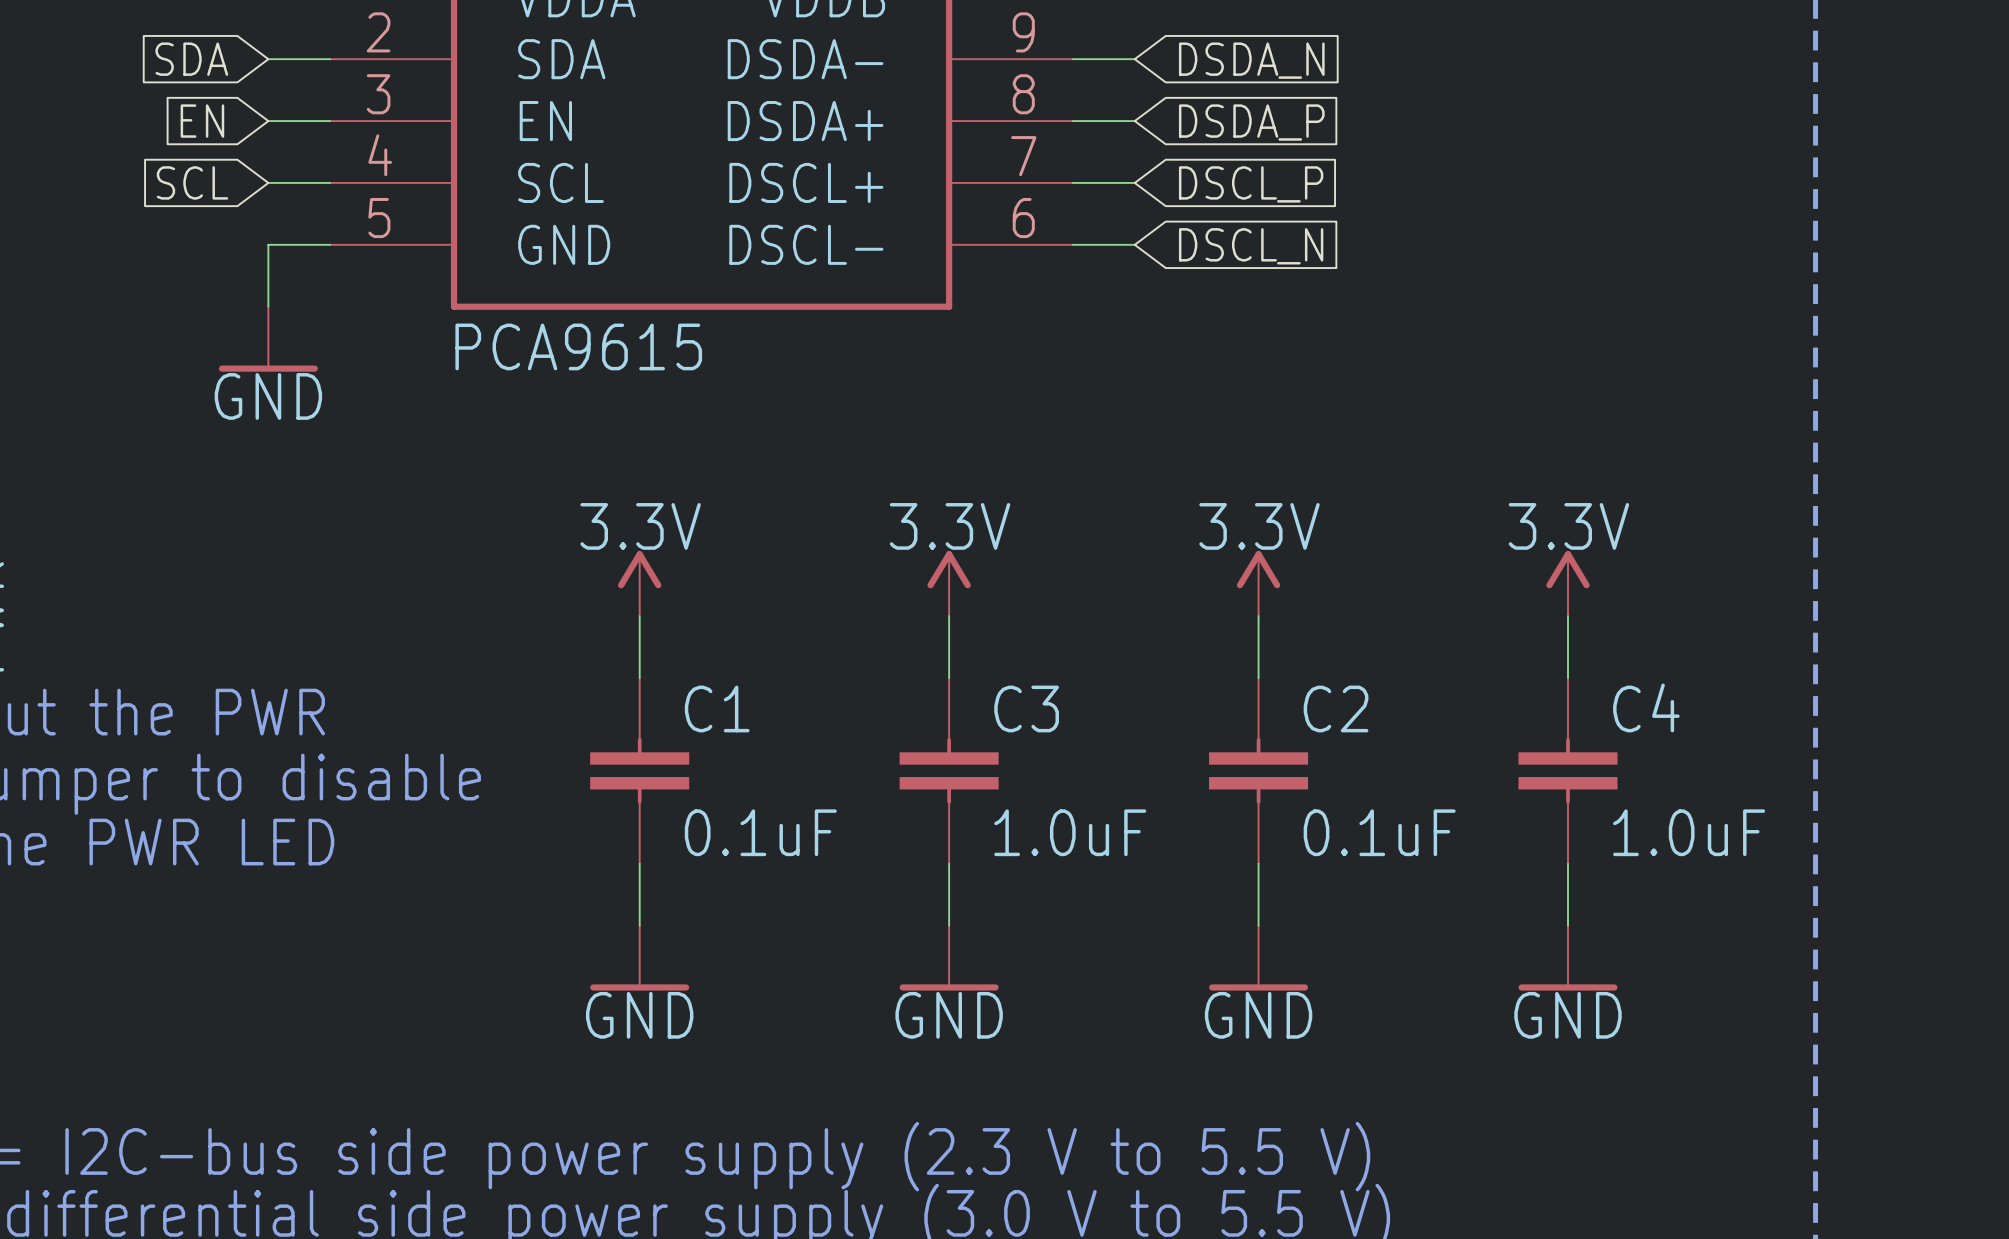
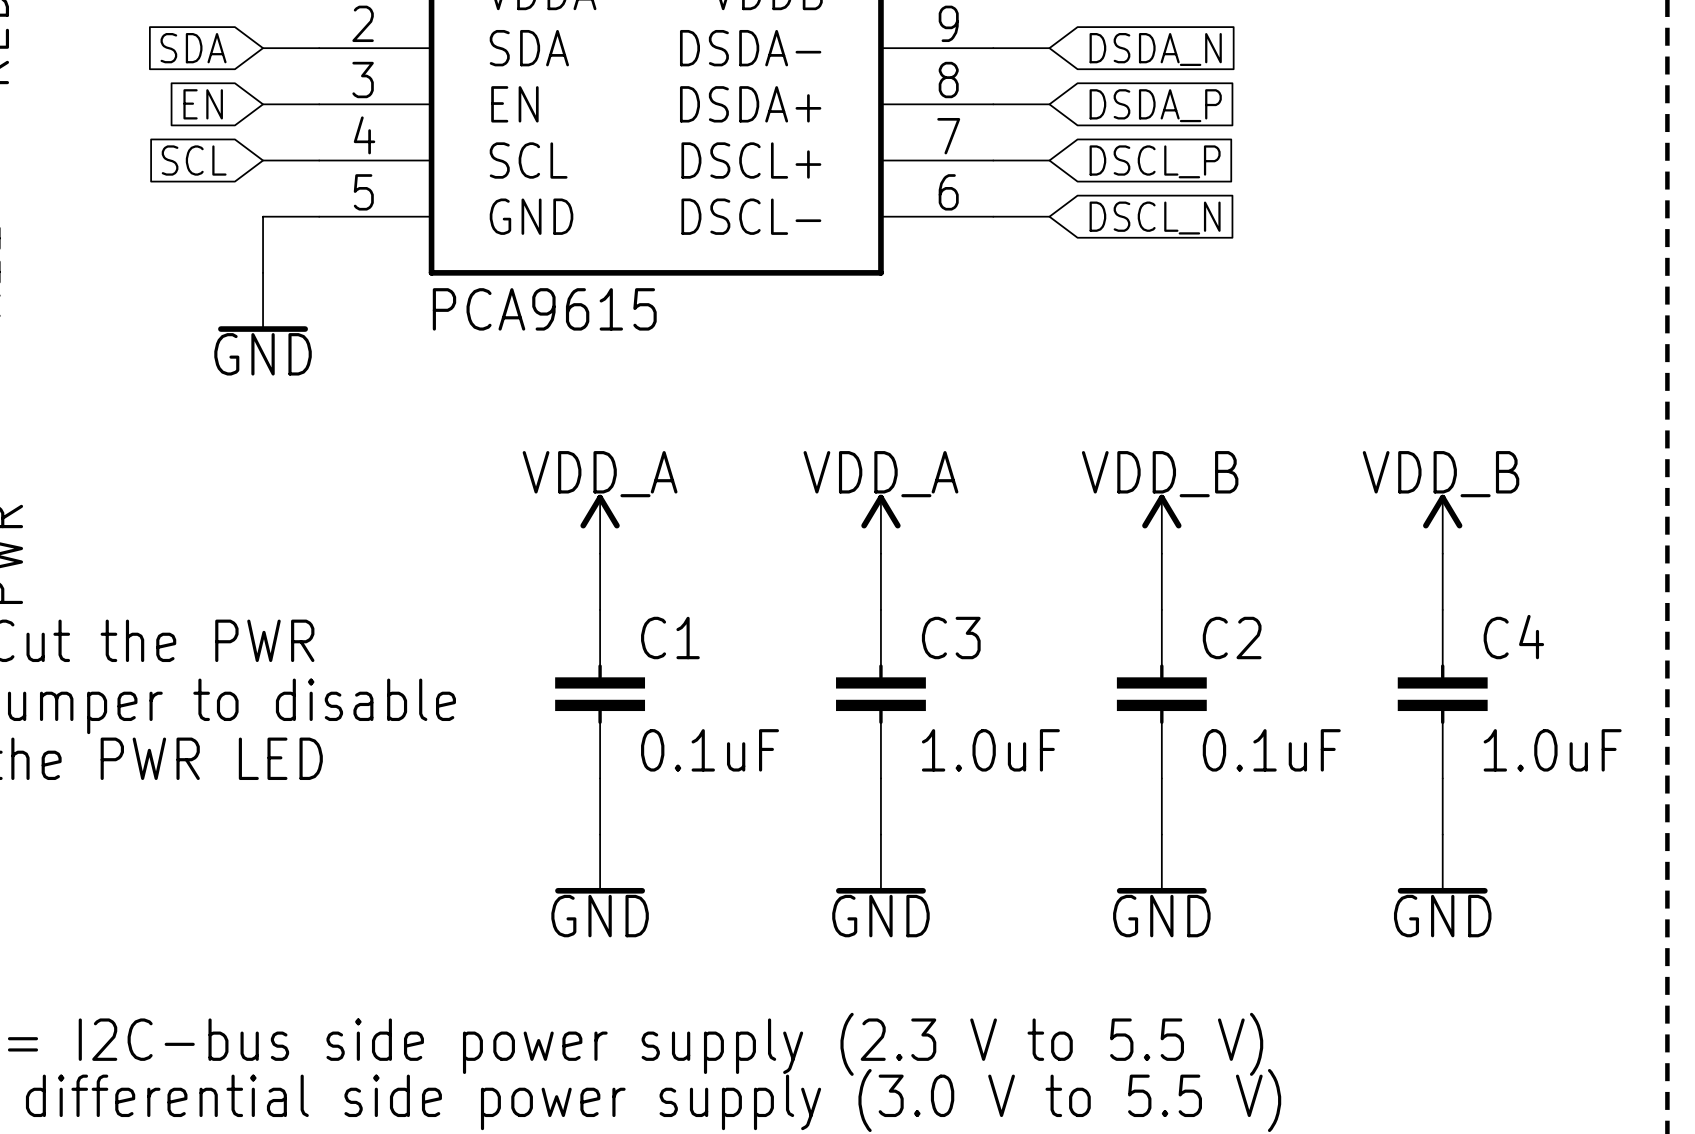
power symbol: 3.3V (639, 583) -> VDD_A (600, 524)
power symbol: 3.3V (949, 583) -> VDD_A (880, 524)
power symbol: 3.3V (1258, 583) -> VDD_B (1161, 524)
power symbol: 3.3V (1568, 583) -> VDD_B (1442, 524)

